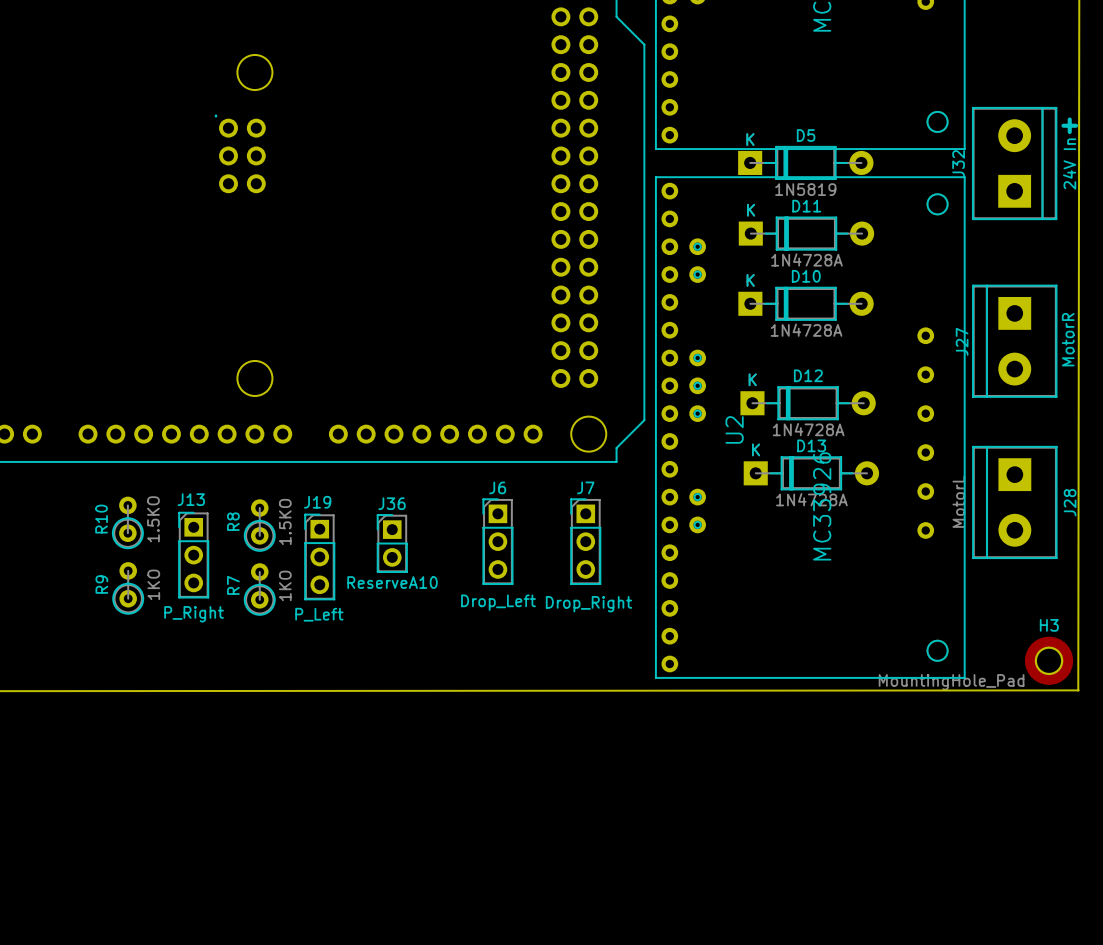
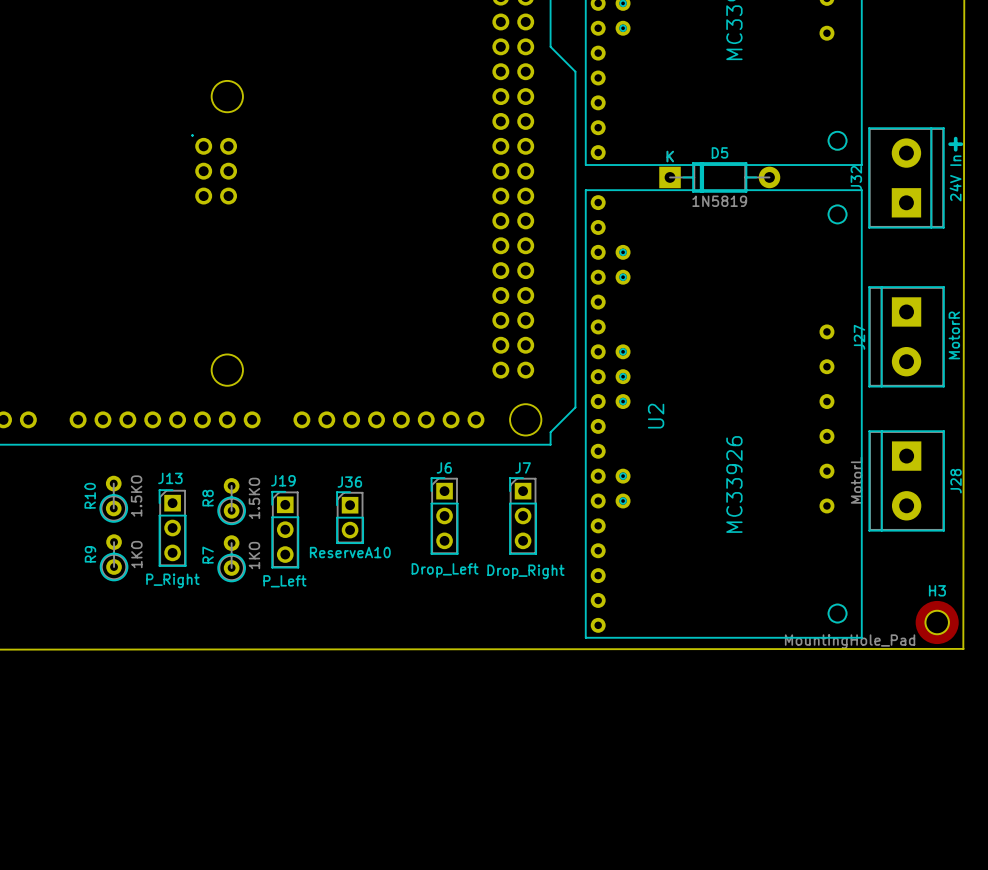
D11: 1N4728A (806, 233) -> none
D10: 1N4728A (806, 303) -> none
D12: 1N4728A (808, 403) -> none
D13: 1N4728A (811, 473) -> none

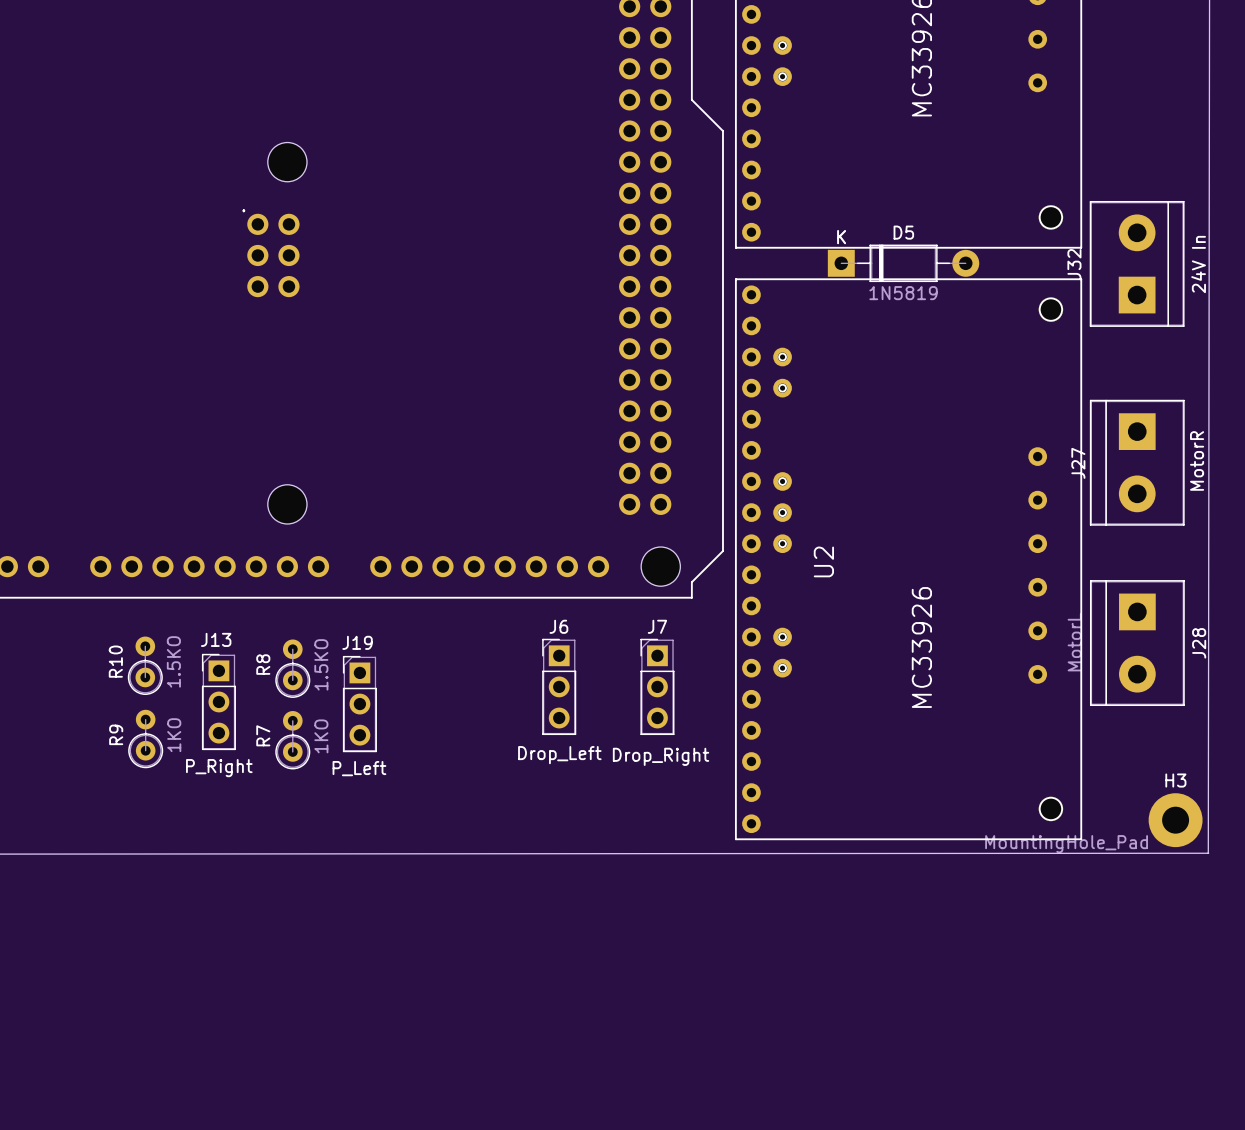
text: + (955, 144) -> none
J36: ReserveA10 (350, 517) -> none

